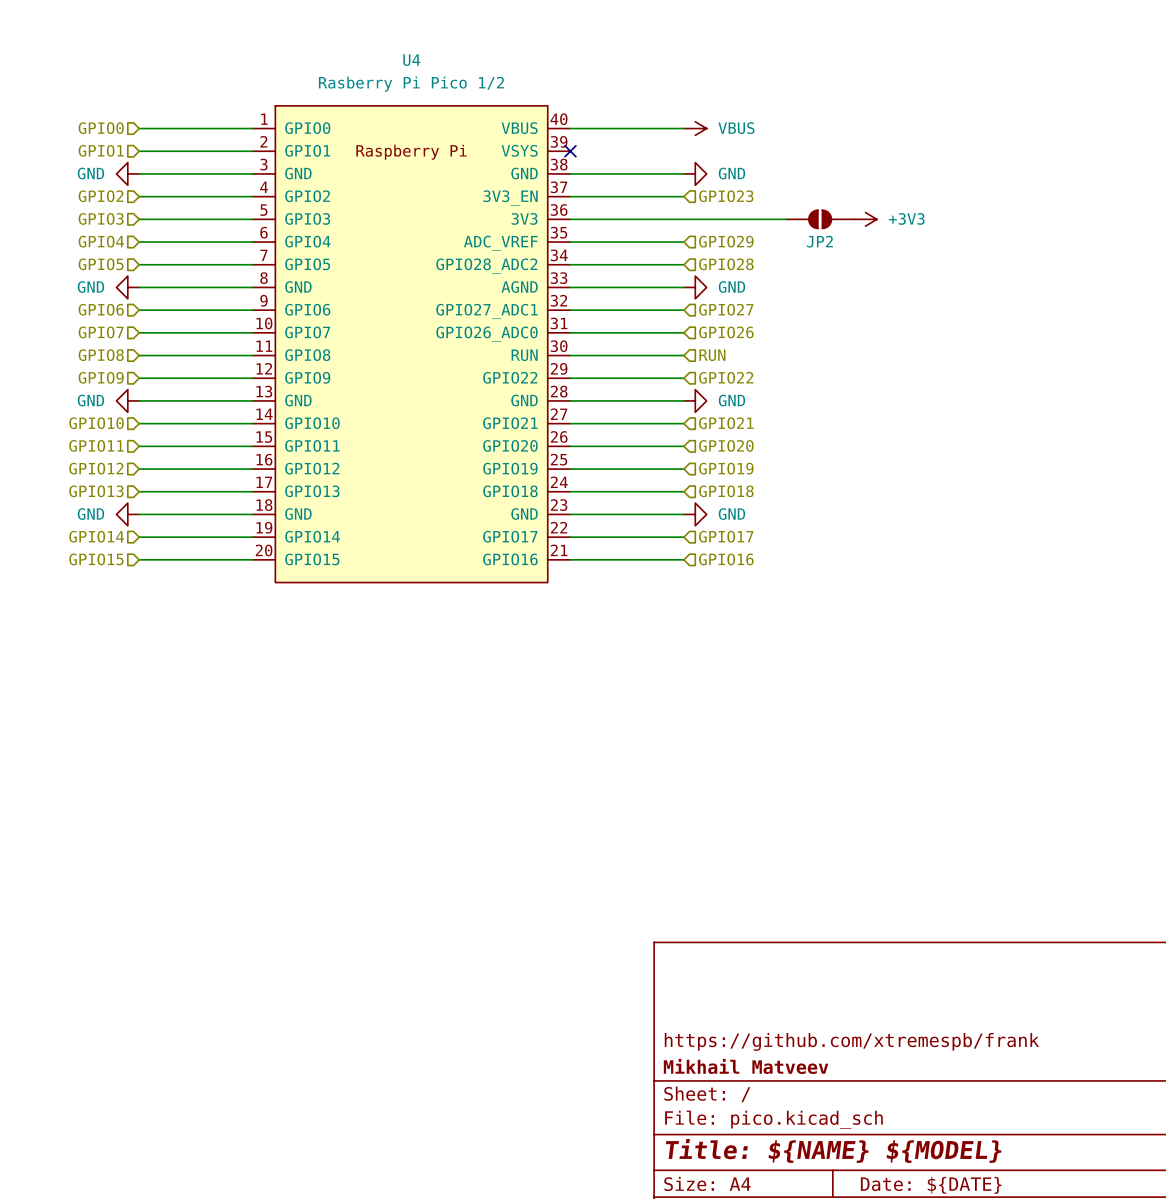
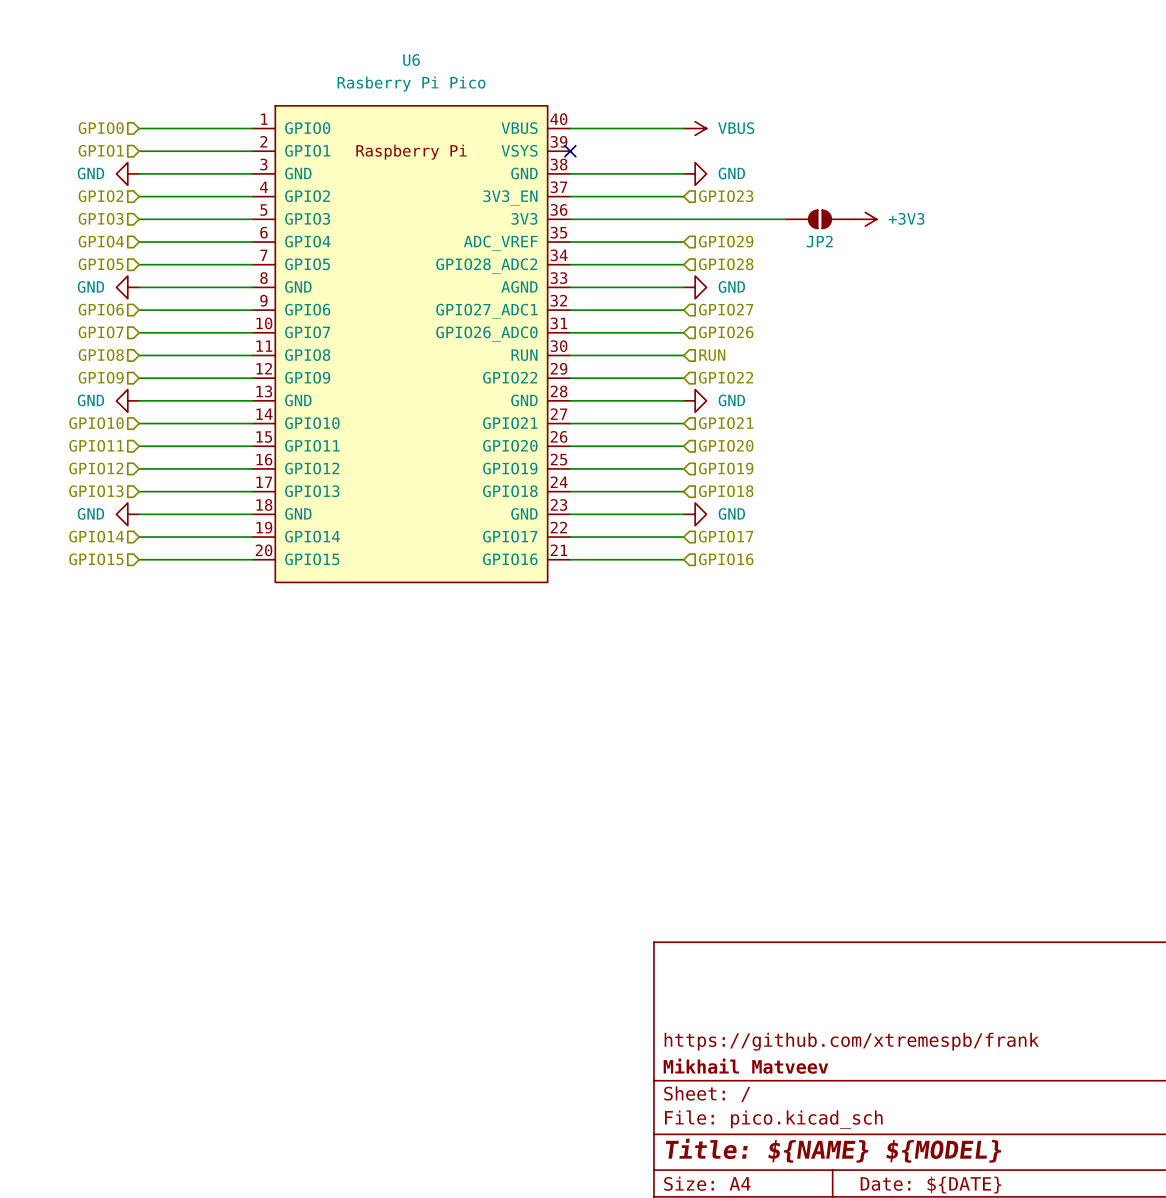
U4 name: U4 (411, 60) -> U6 (411, 60)
U4 value: Rasberry Pi Pico 1/2 (411, 84) -> Rasberry Pi Pico (411, 84)

